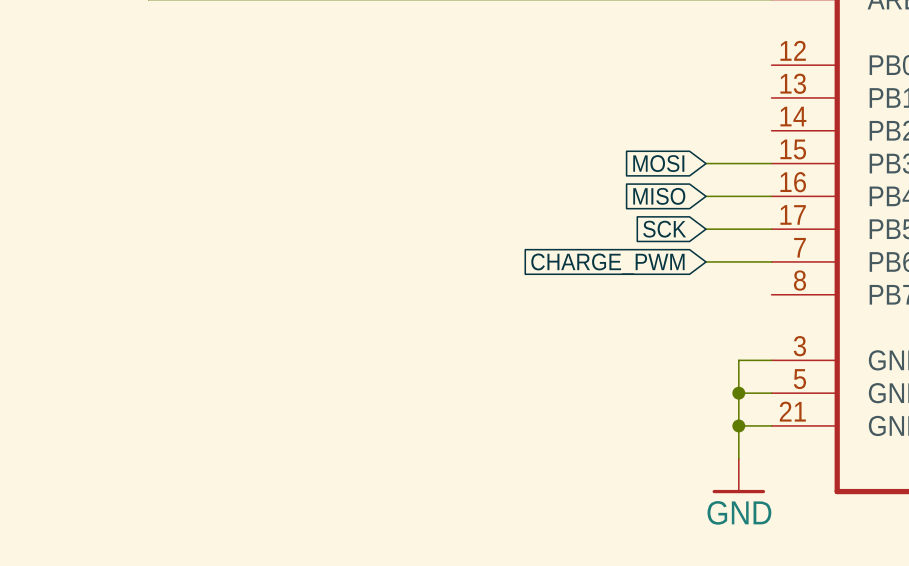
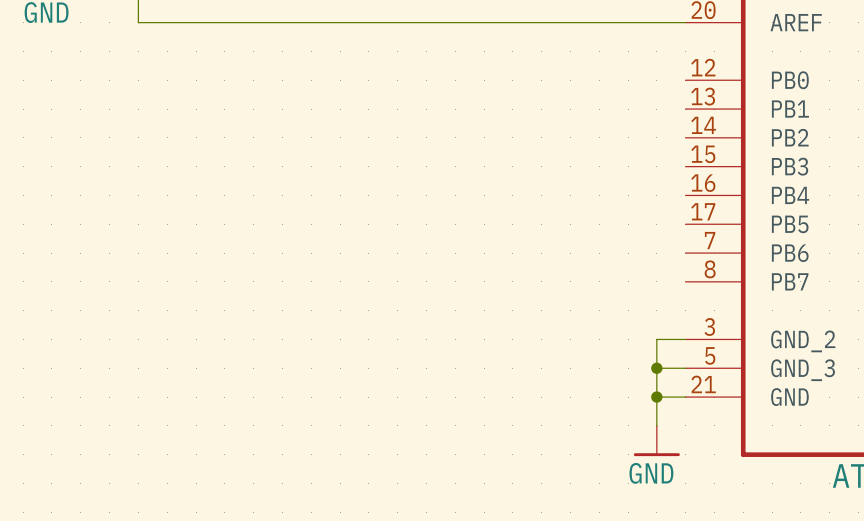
global label: MOSI (658, 163) -> none
wire: (706, 163) (771, 163) -> none
global label: MISO (659, 196) -> none
wire: (706, 196) (771, 196) -> none
global label: SCK (664, 229) -> none
wire: (706, 229) (771, 229) -> none
wire: (706, 261) (771, 261) -> none
global label: CHARGE_PWM (607, 264) -> none

